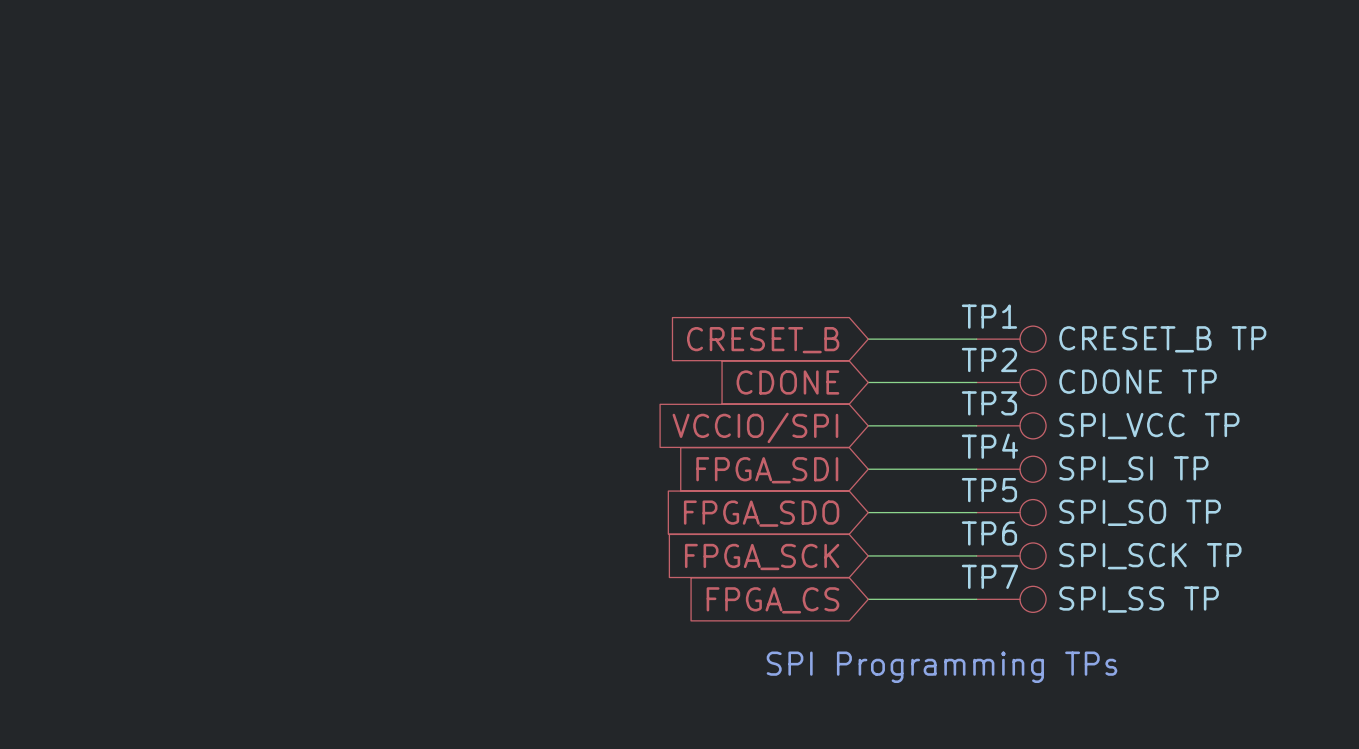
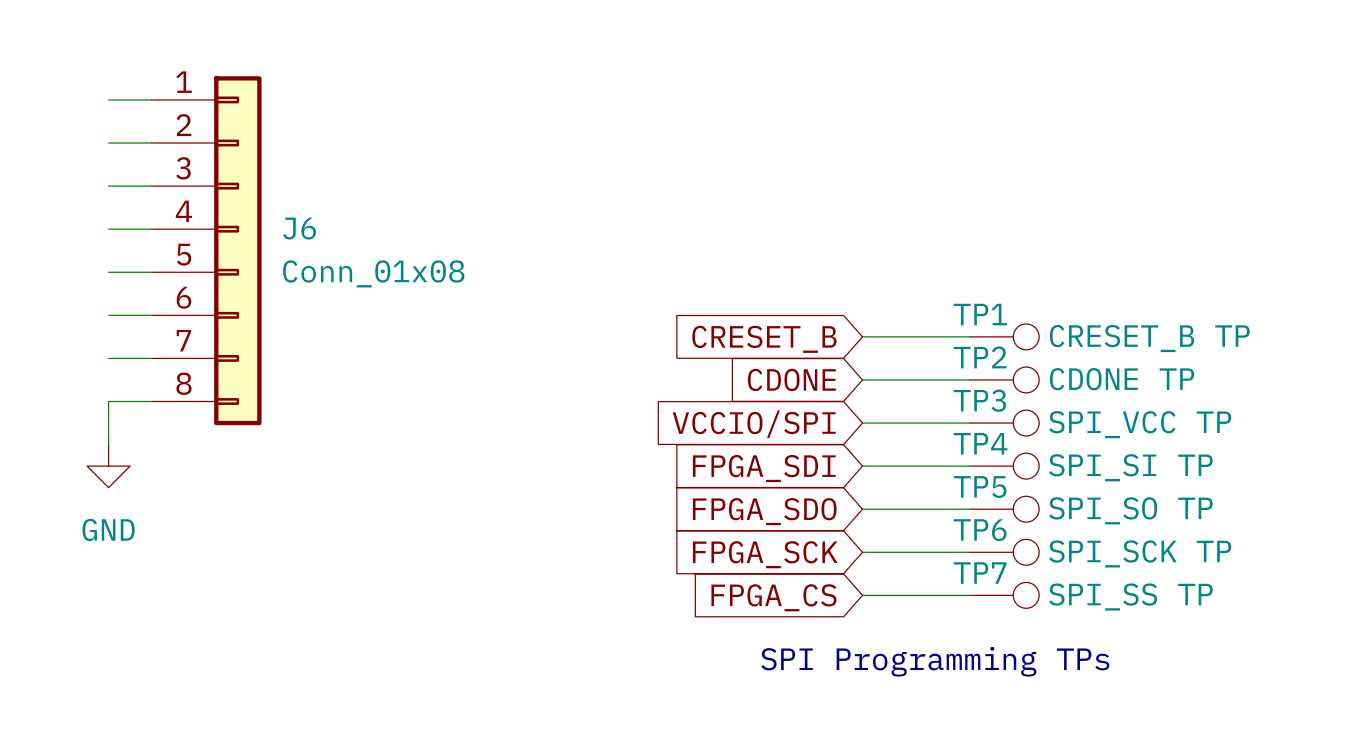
wire: none -> (108, 99) (151, 99)
wire: none -> (108, 143) (151, 143)
wire: none -> (108, 186) (151, 186)
wire: none -> (108, 229) (151, 229)
J6: none -> Conn_01x08 (206, 250)
wire: none -> (108, 272) (151, 272)
wire: none -> (108, 315) (151, 315)
wire: none -> (108, 358) (151, 358)
wire: none -> (151, 401) (108, 401) (108, 444)
power symbol: none -> GND (108, 466)

